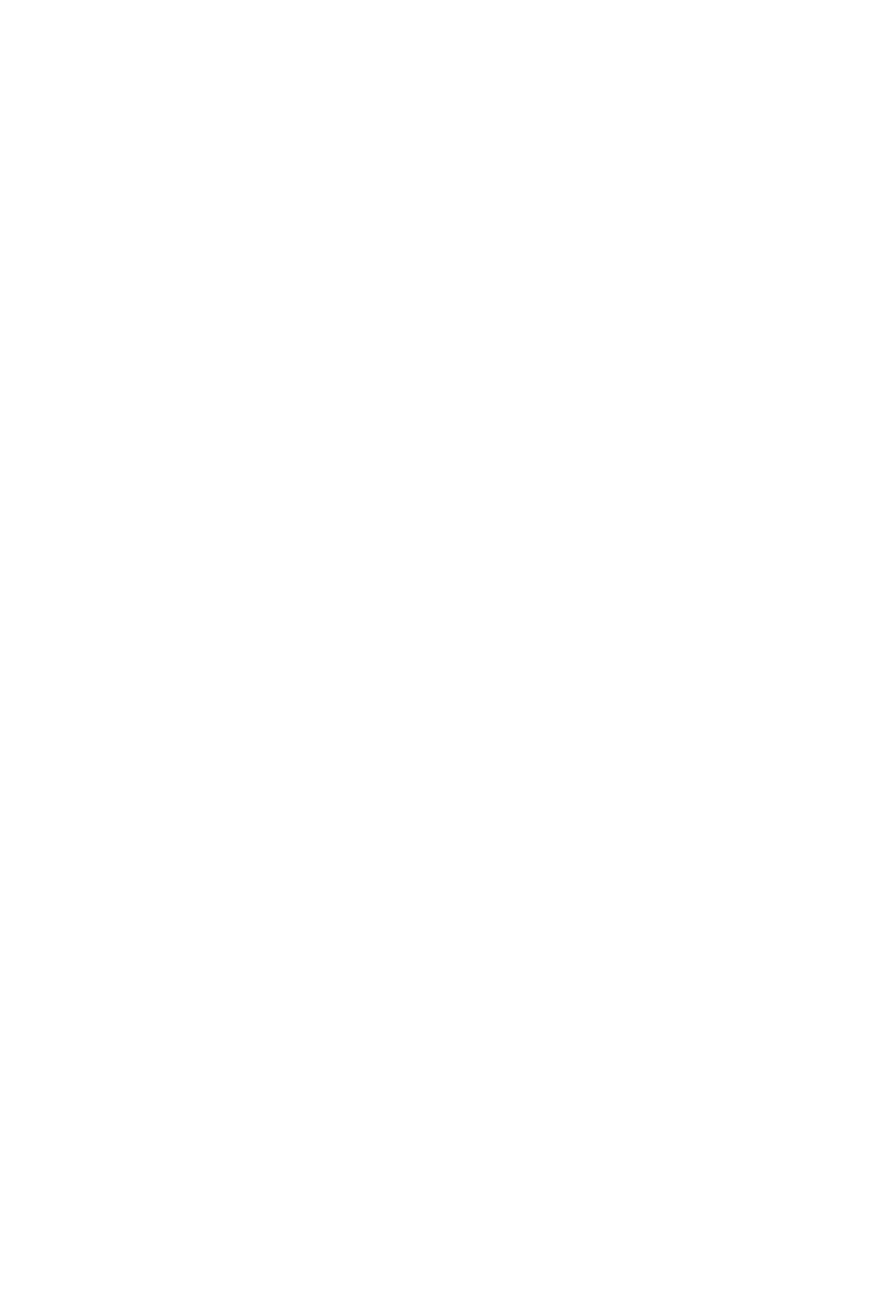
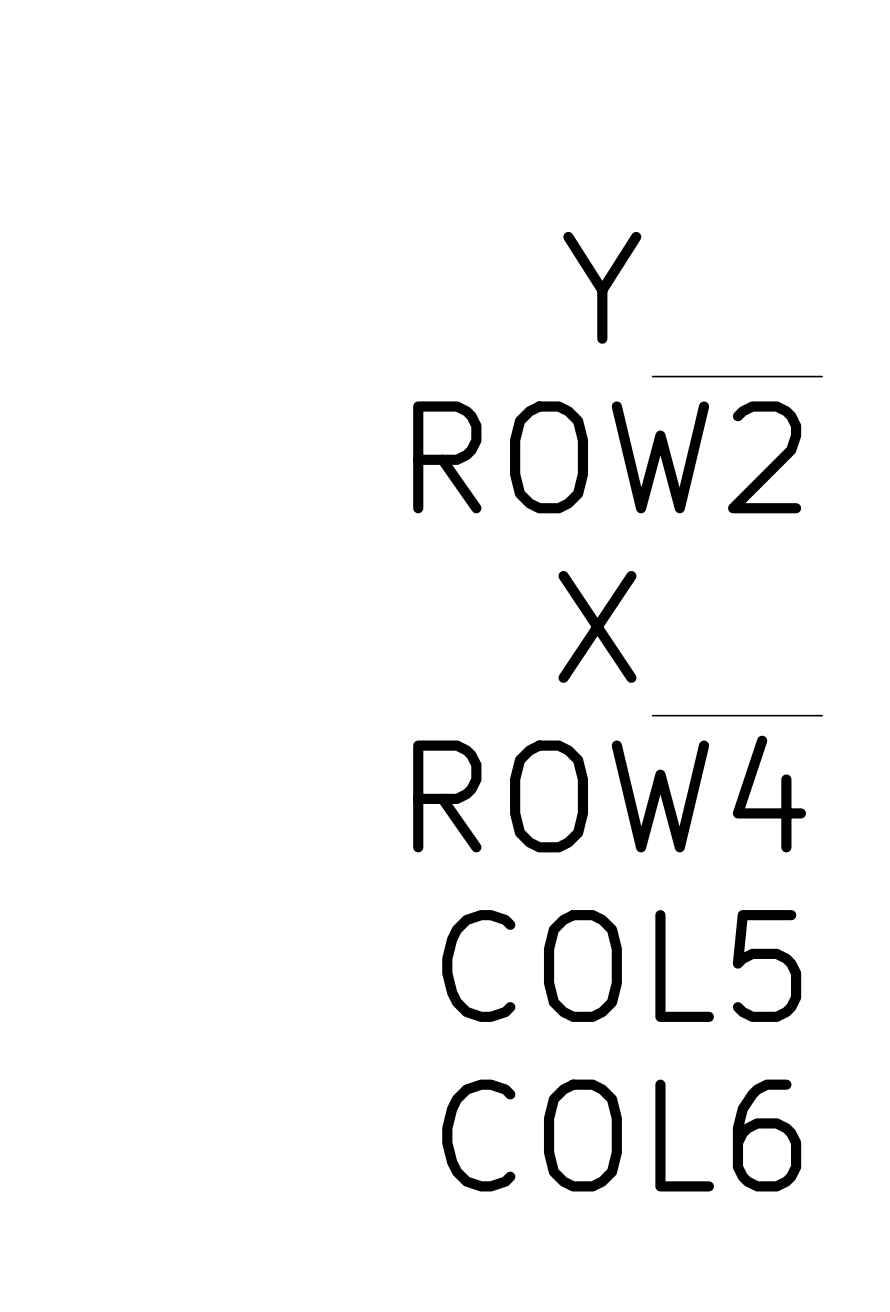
label: none -> Y (602, 287)
wire: none -> (652, 376) (822, 376)
label: none -> ROW2 (607, 457)
label: none -> X (597, 626)
wire: none -> (652, 715) (822, 715)
label: none -> ROW4 (609, 794)
label: none -> COL5 (621, 966)
label: none -> COL6 (621, 1135)

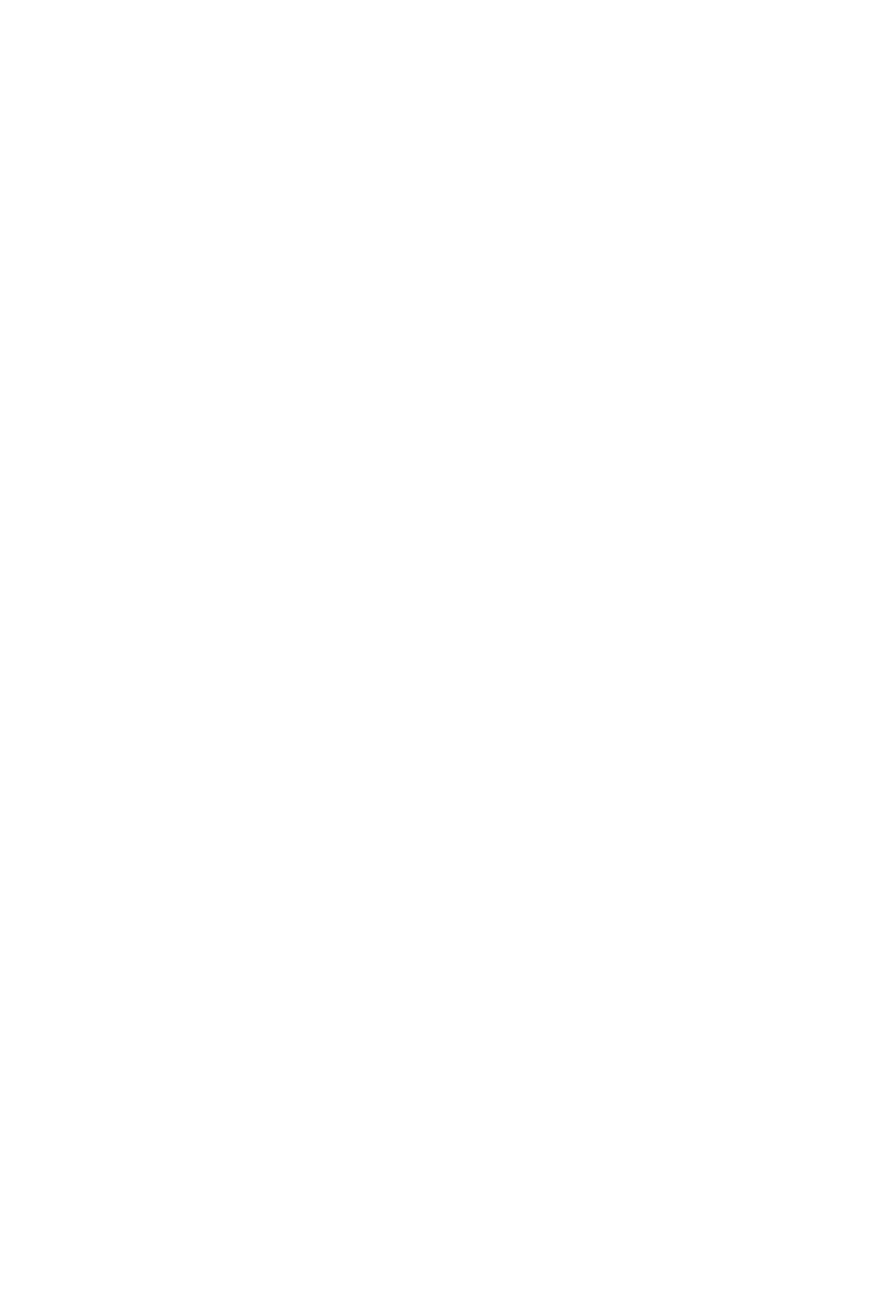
label: Y (602, 287) -> none
wire: (652, 376) (822, 376) -> none
label: ROW2 (607, 457) -> none
label: X (597, 626) -> none
wire: (652, 715) (822, 715) -> none
label: ROW4 (609, 794) -> none
label: COL5 (621, 966) -> none
label: COL6 (621, 1135) -> none

